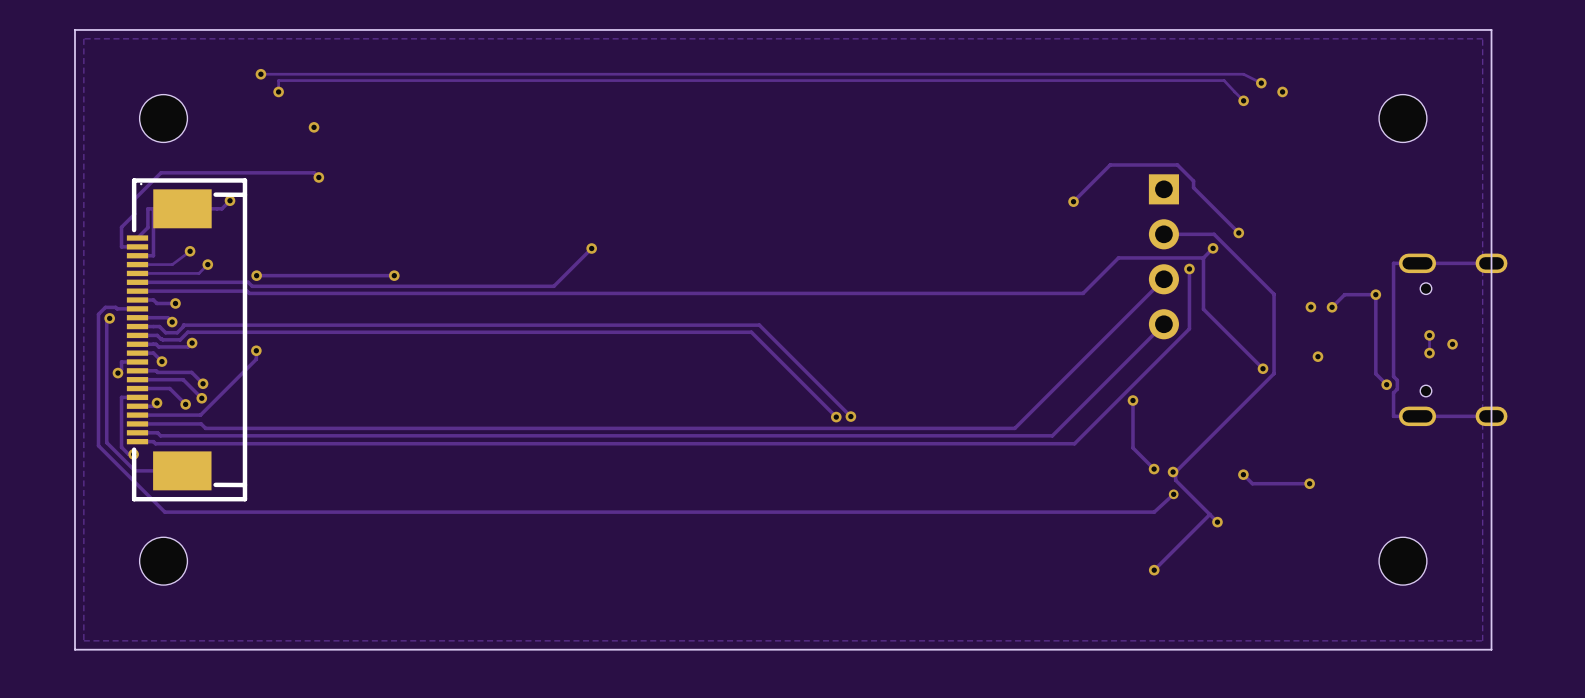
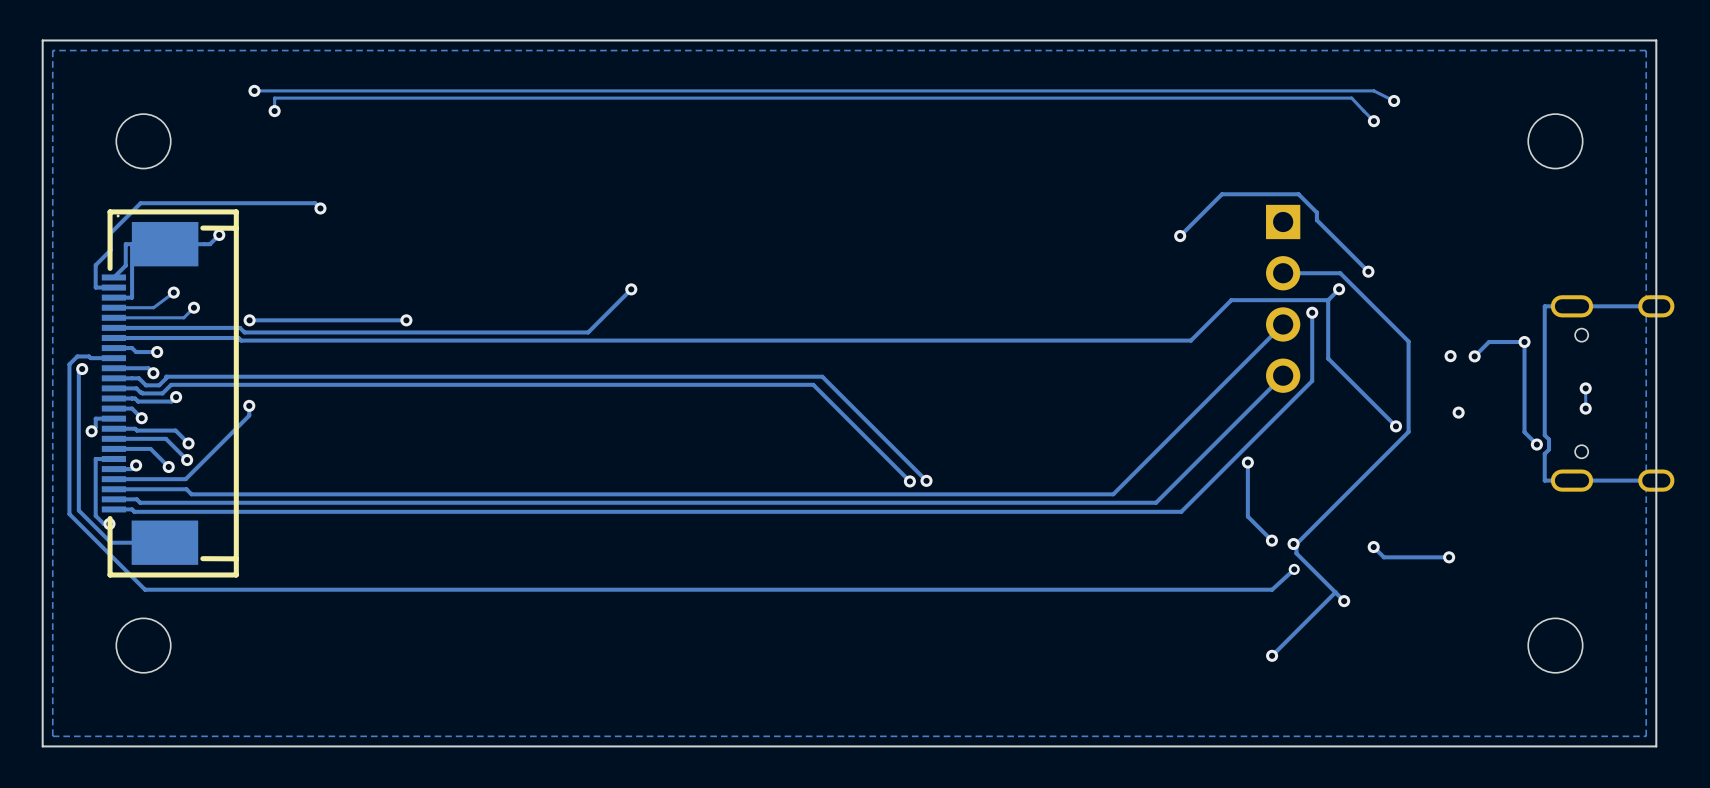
via: (1282, 91) -> none
via: (314, 127) -> none
via: (1452, 344) -> none

